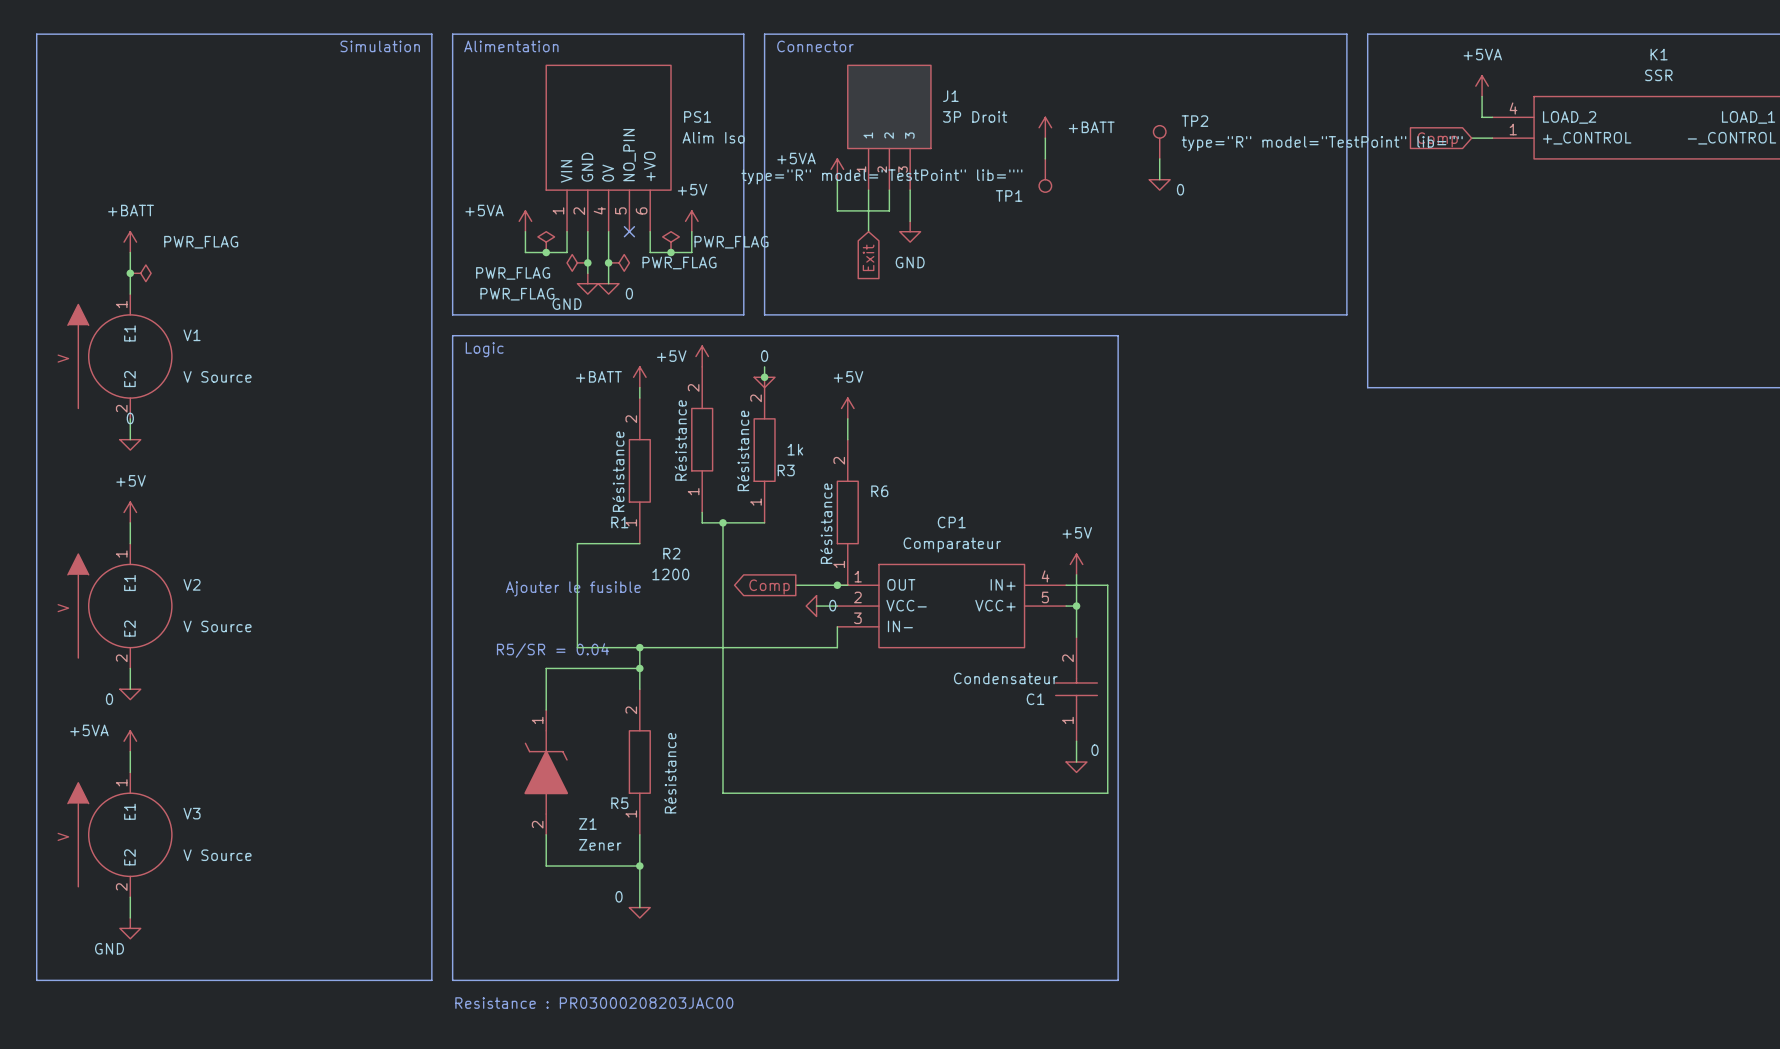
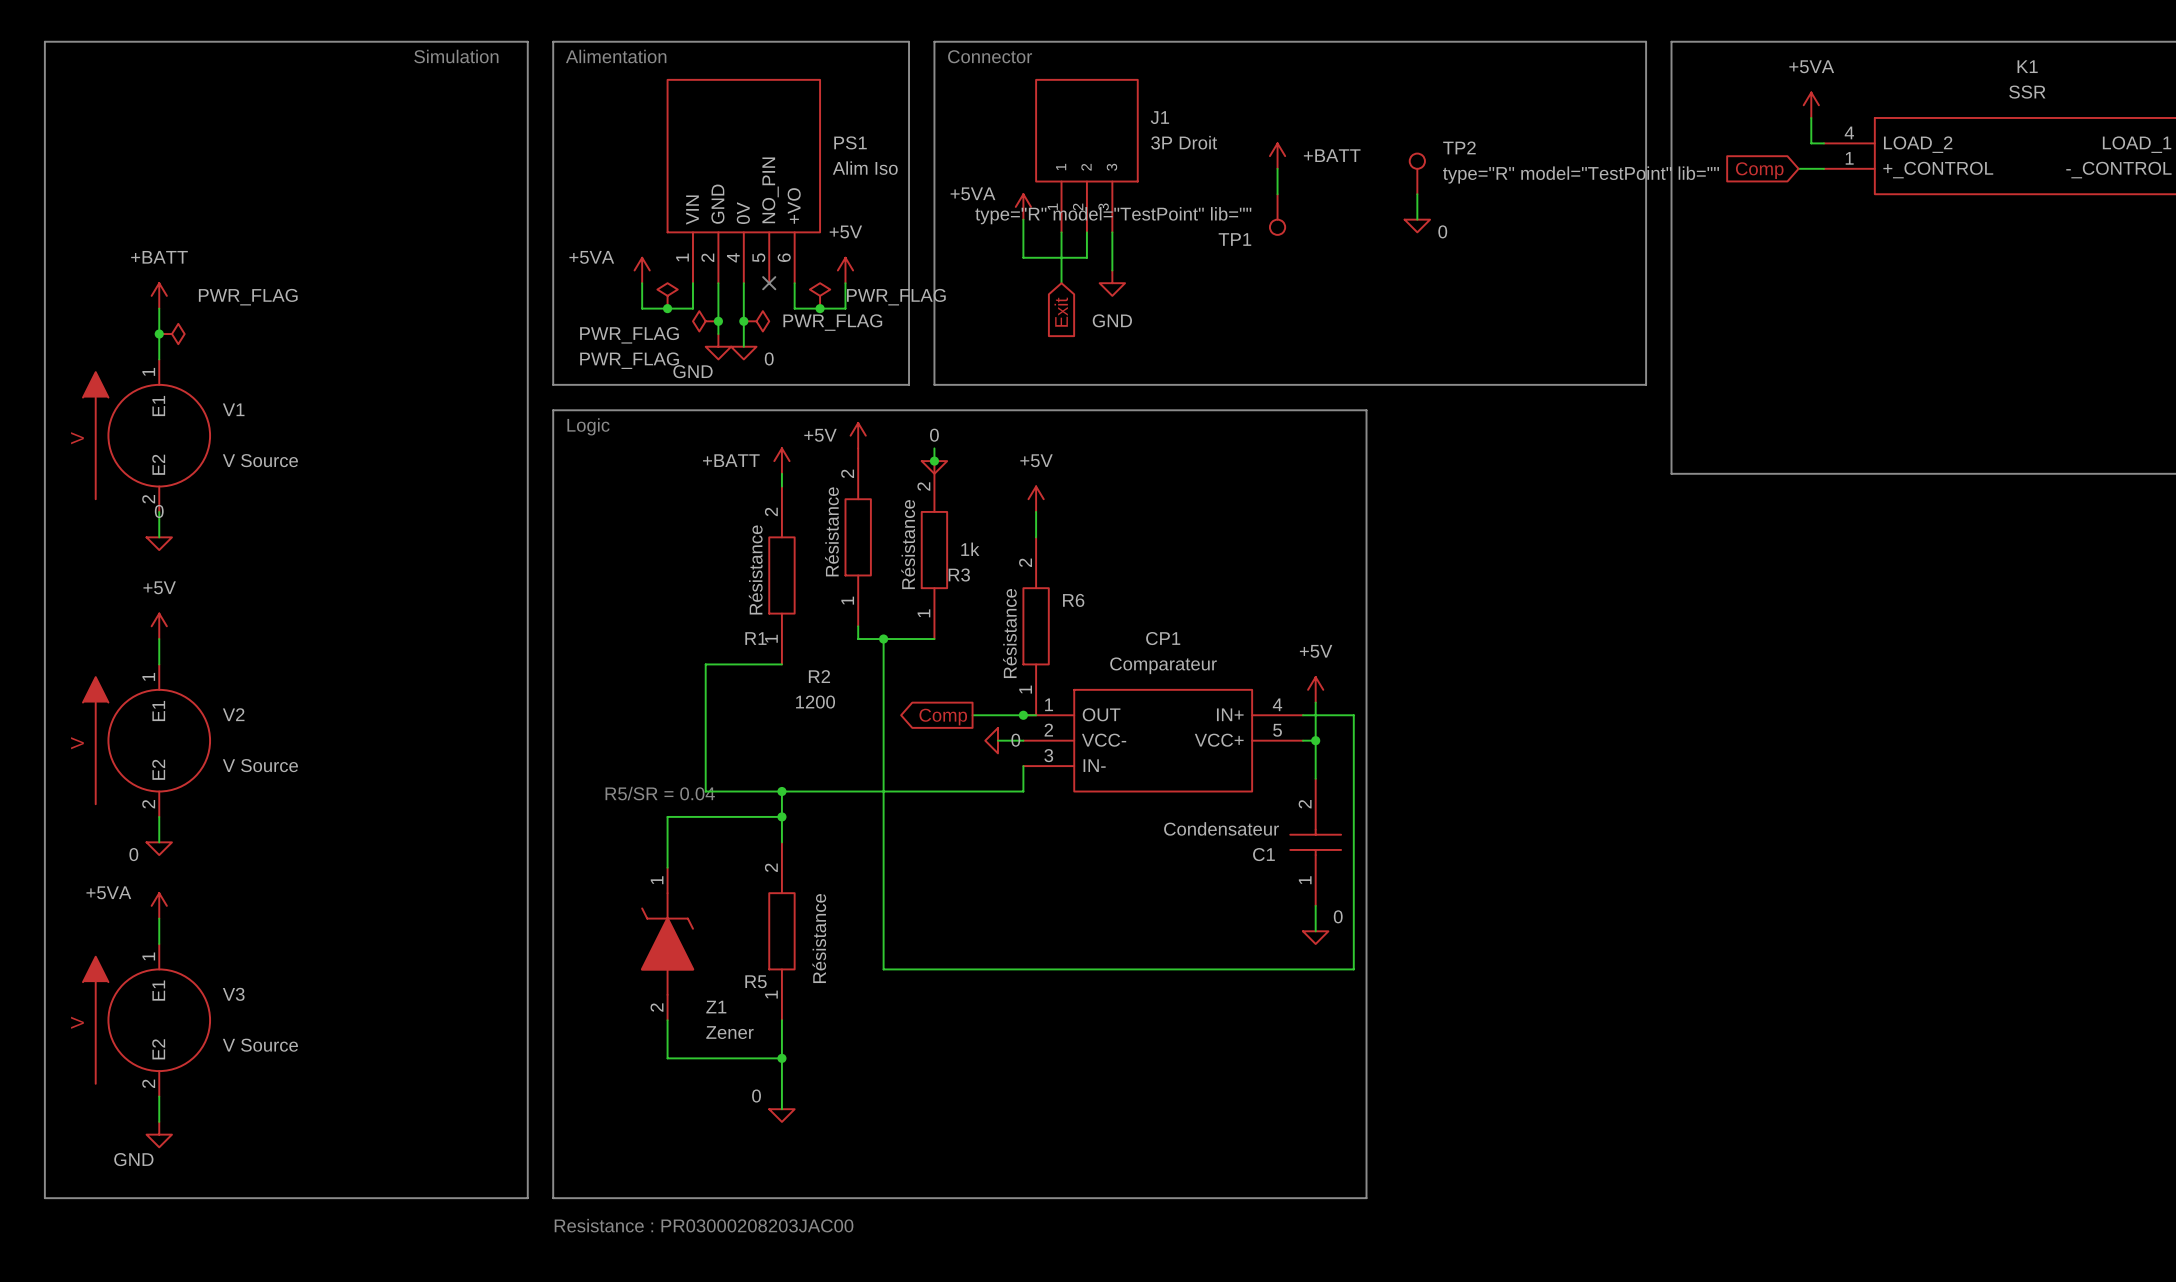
text: Ajouter le fusible (573, 588) -> none

